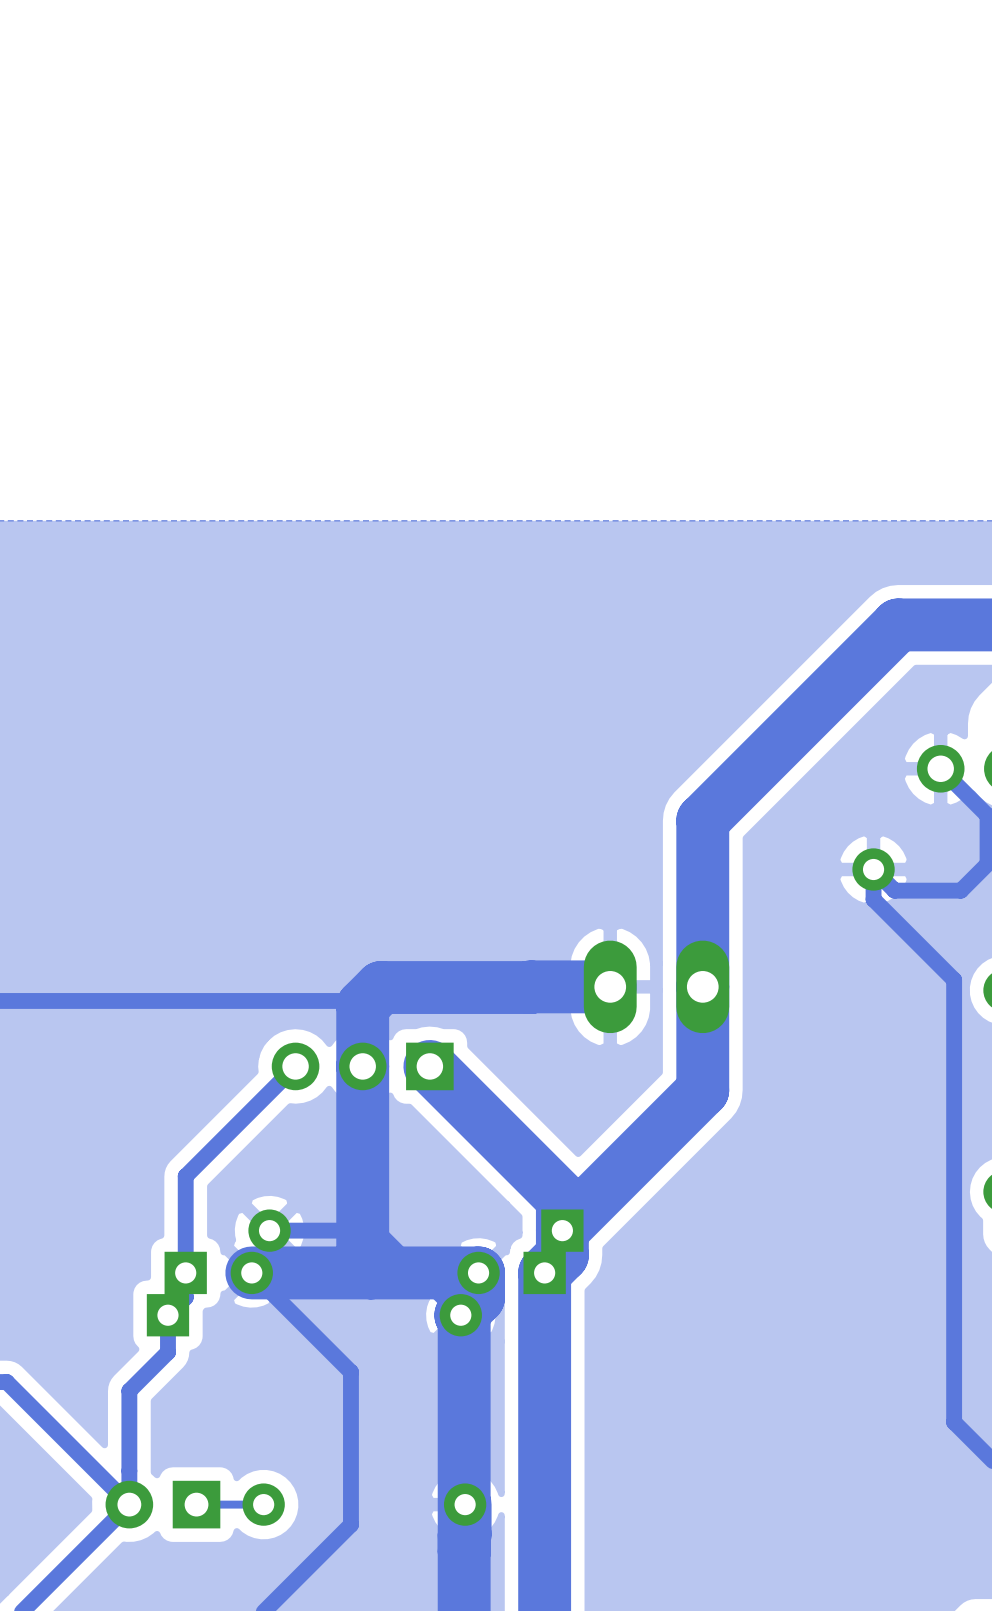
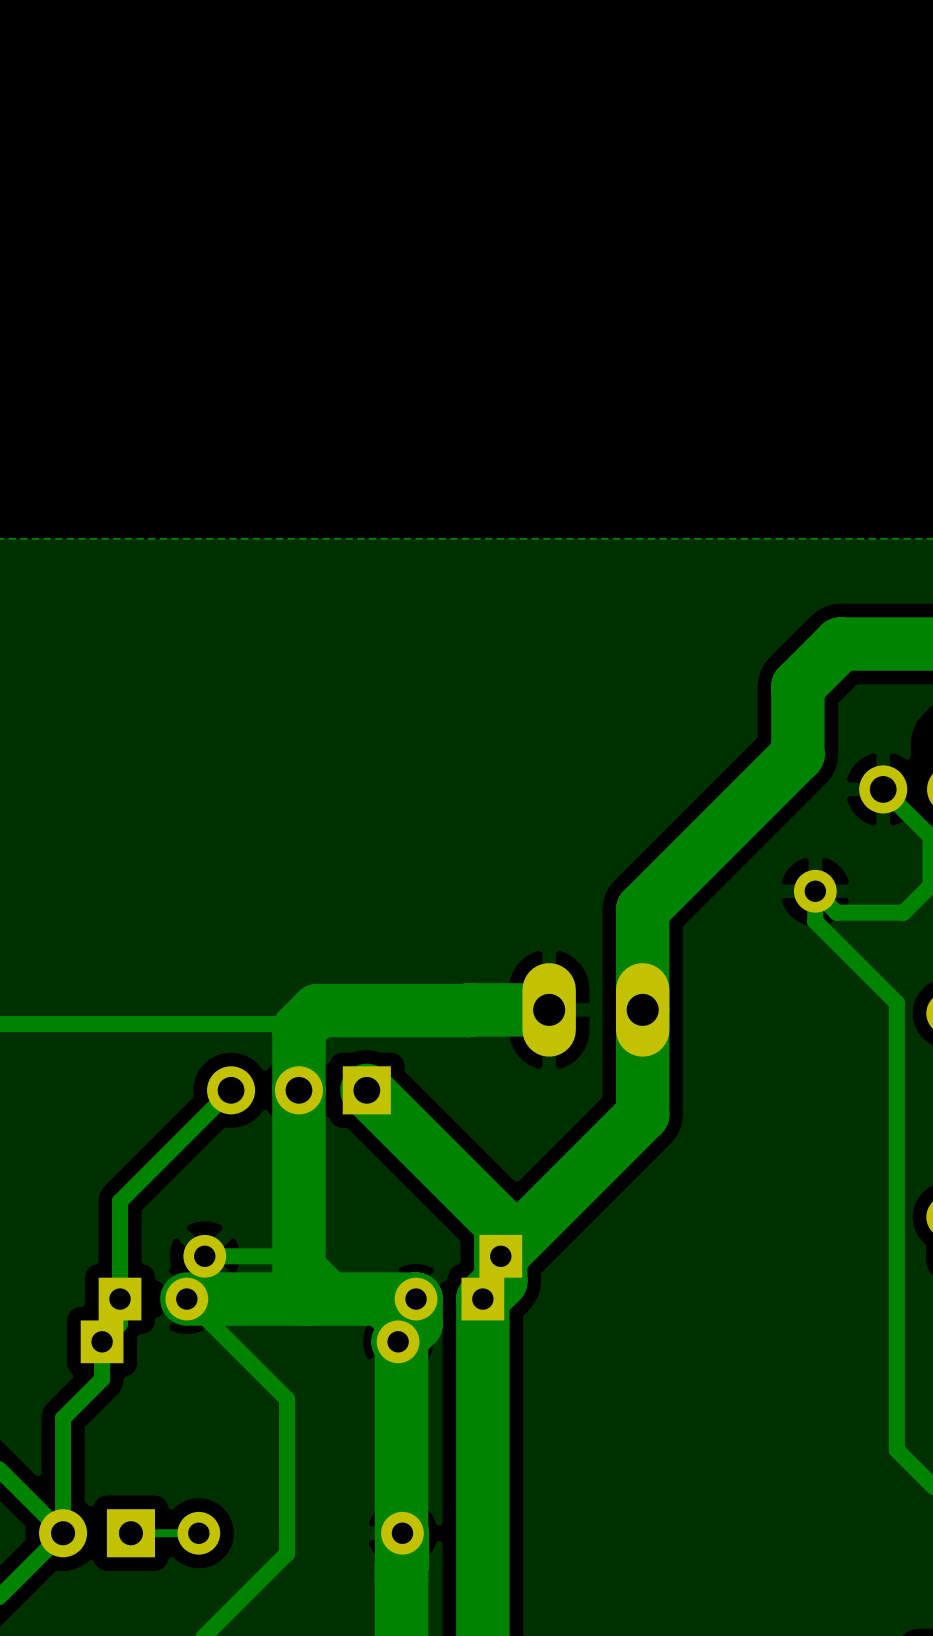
track: (856, 666) (702, 820) (702, 887) -> (797, 686) (797, 754) (642, 909)

